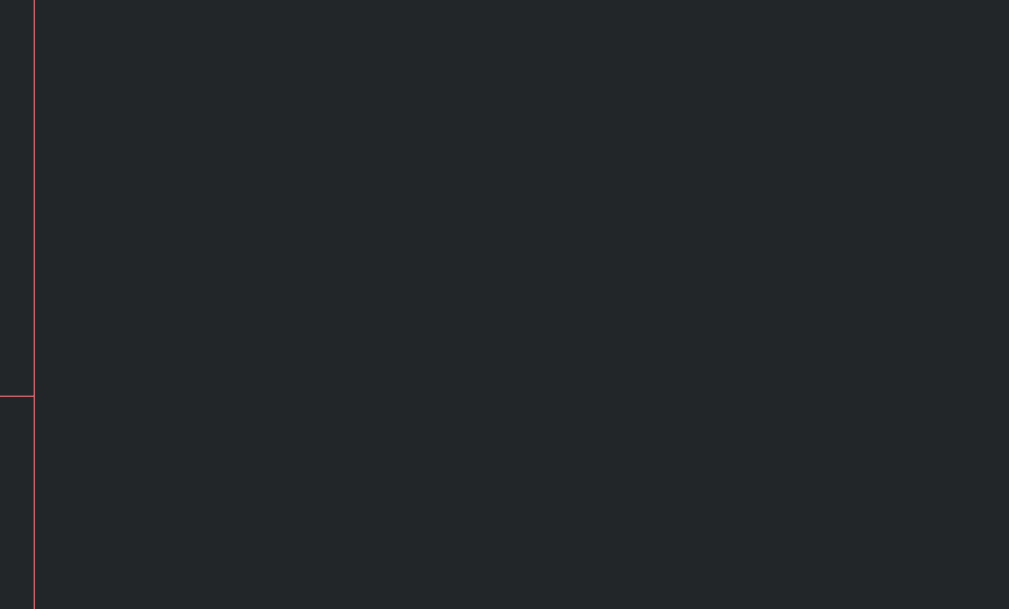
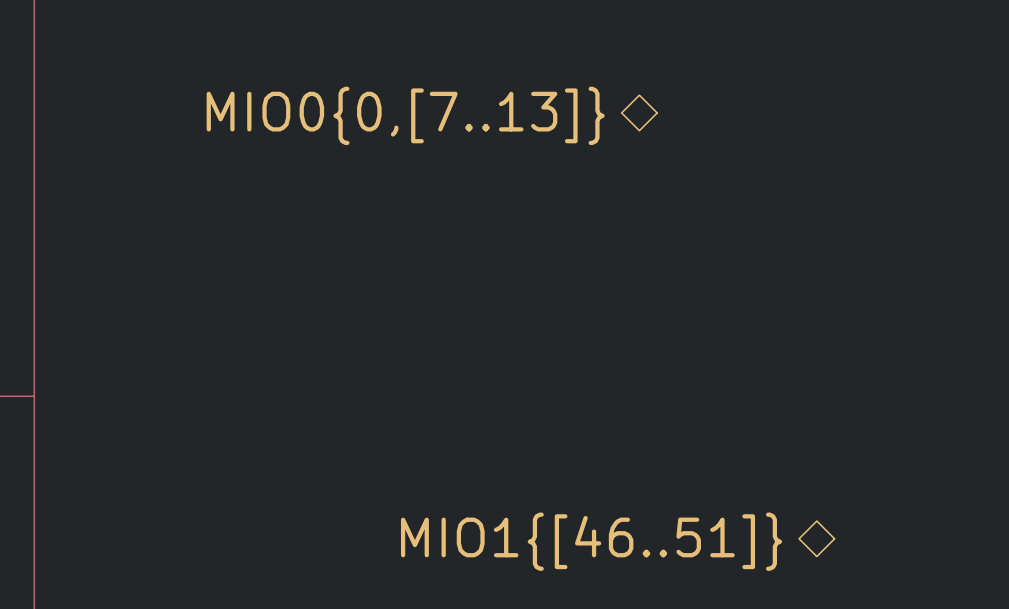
hierarchical label: none -> MIO0{0,[7..13]} (405, 115)
hierarchical label: none -> MIO1{[46..51]} (591, 541)

